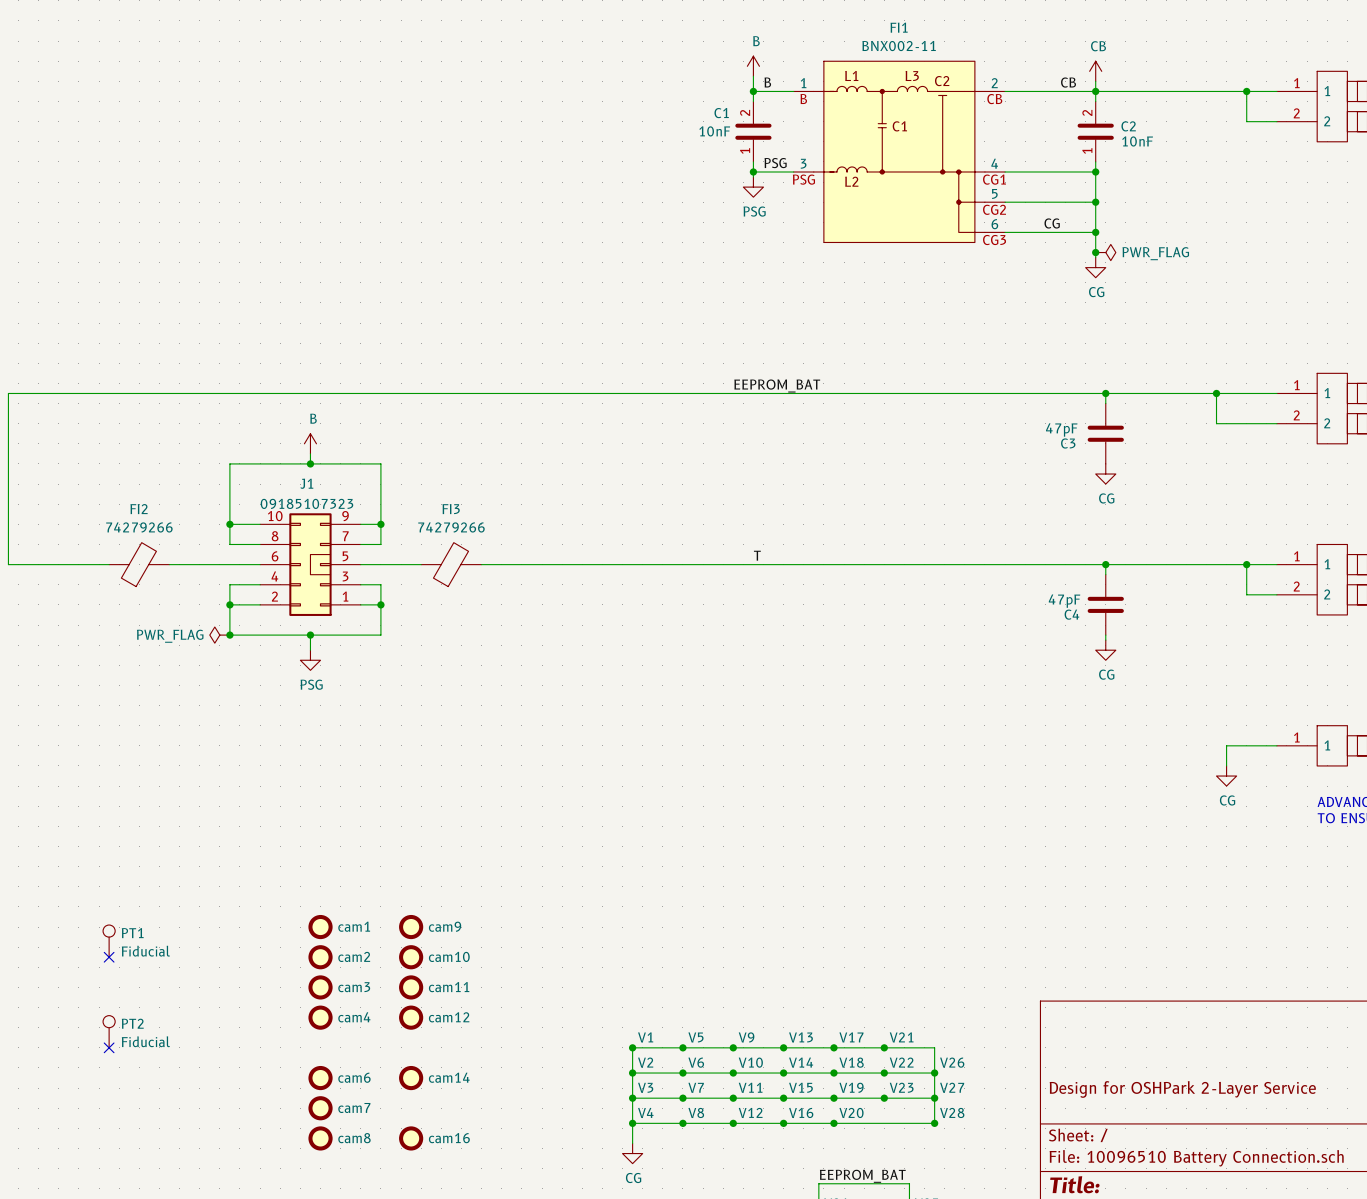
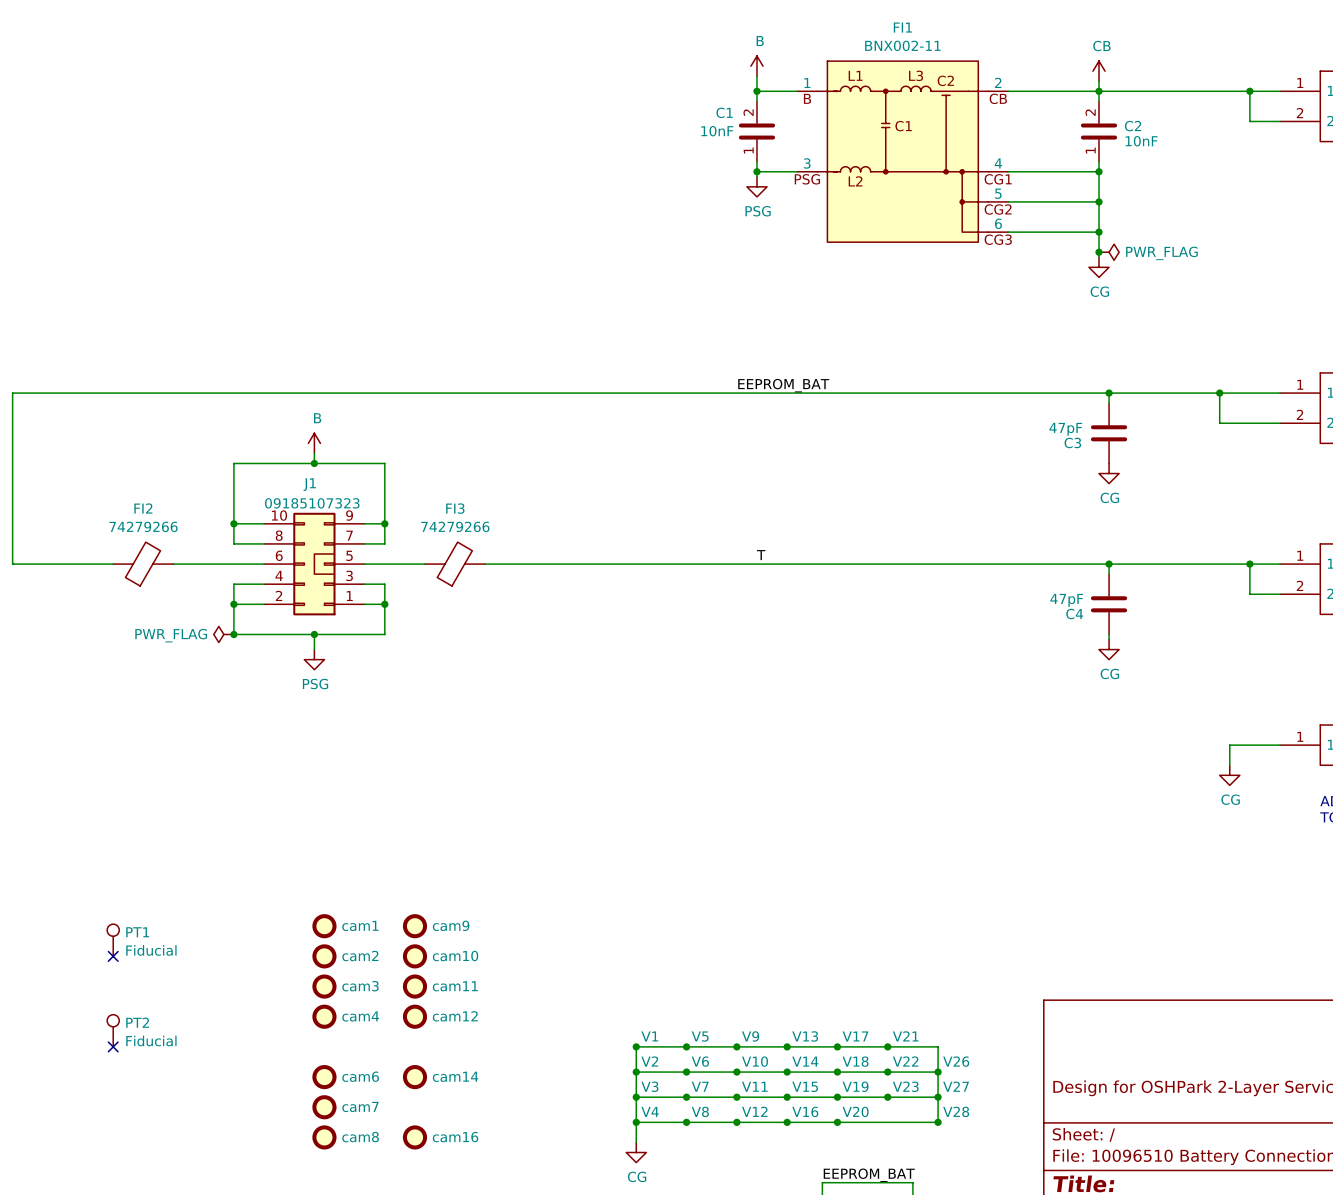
label: B (767, 82) -> none
label: CB (1068, 82) -> none
label: PSG (775, 163) -> none
label: CG (1052, 223) -> none

